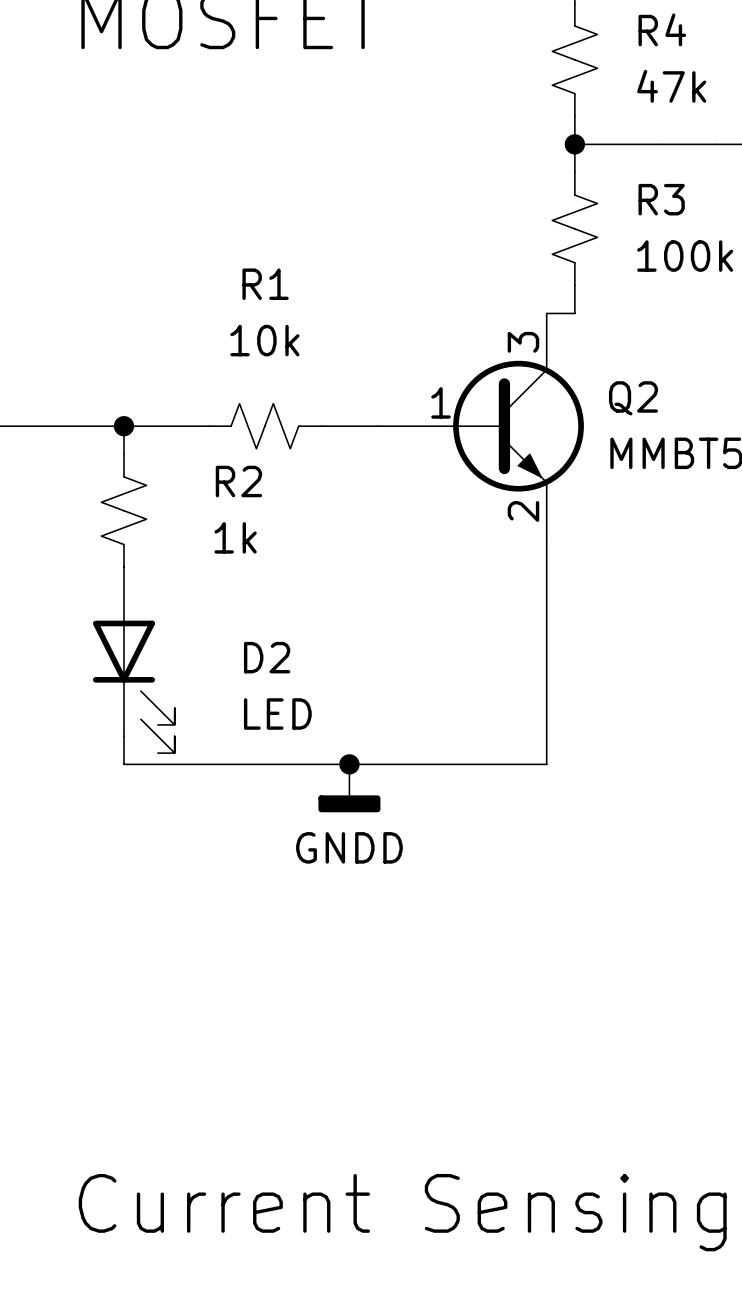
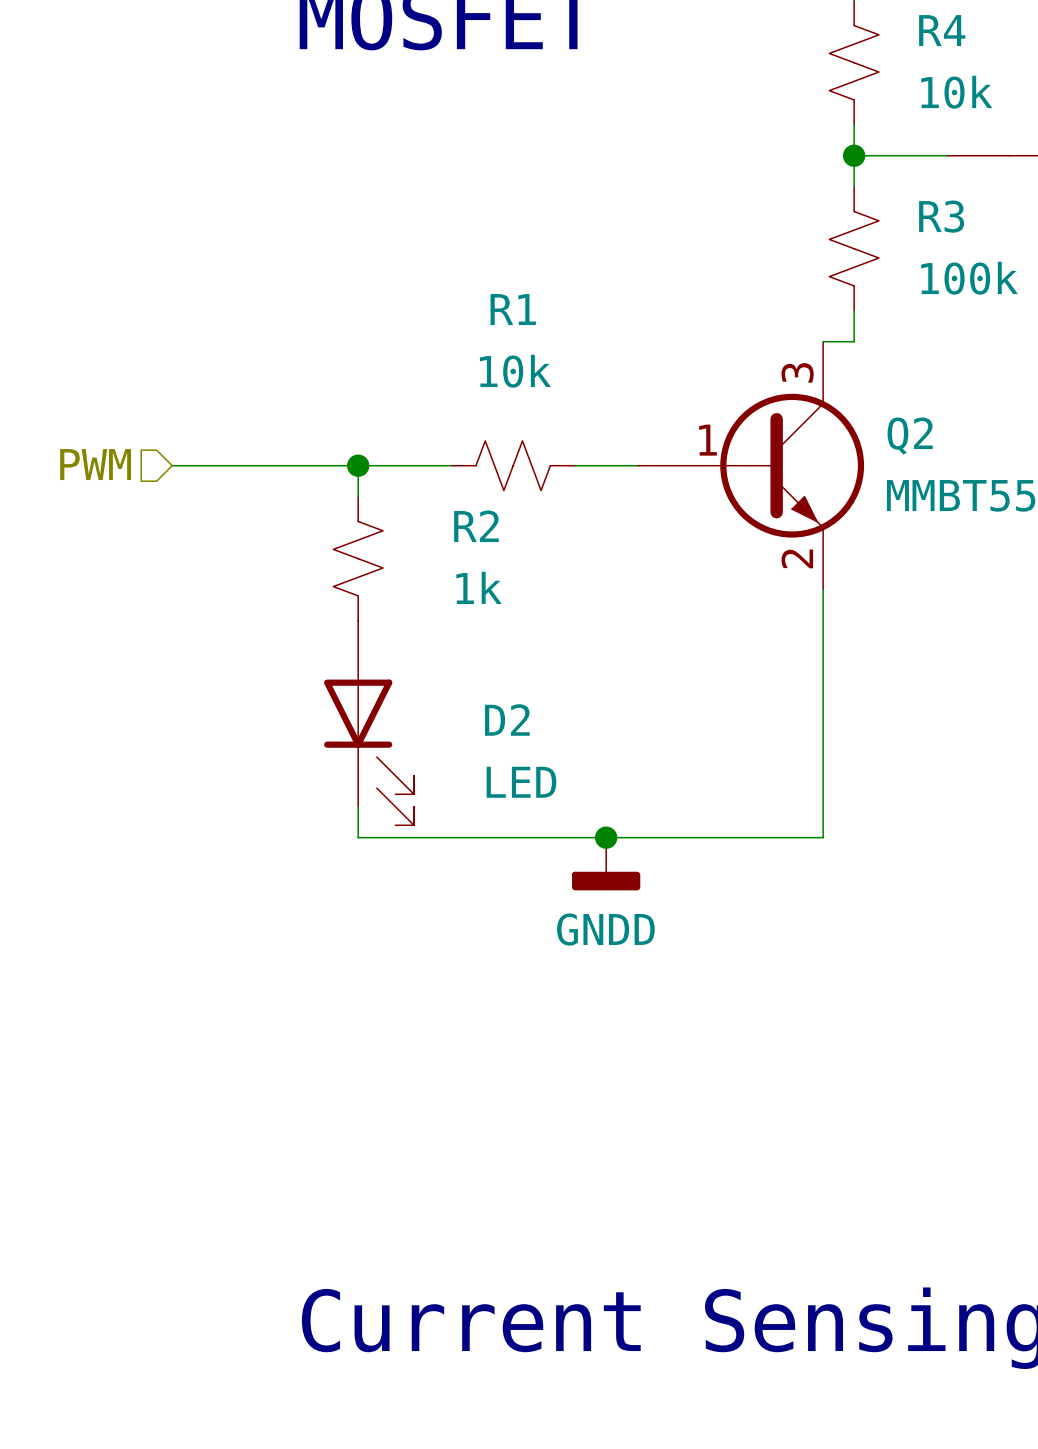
R4 value: 47k (671, 86) -> 10k (956, 92)

